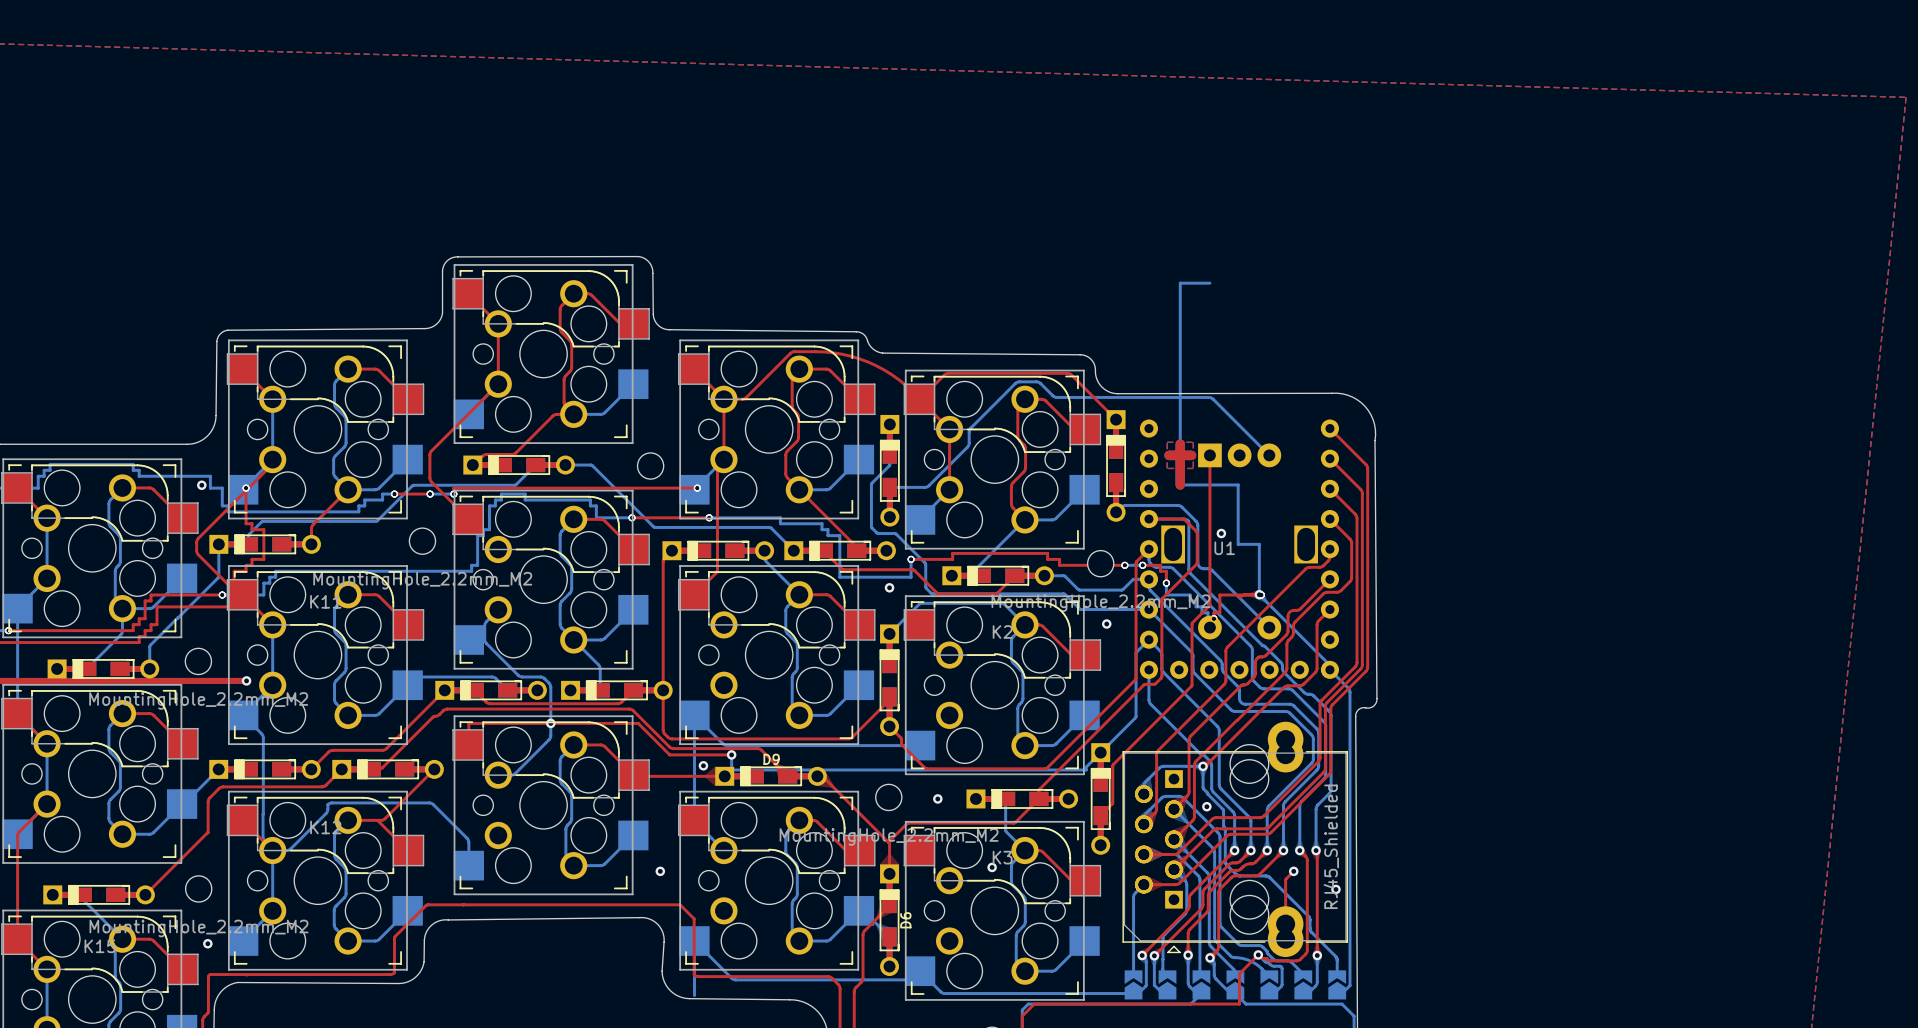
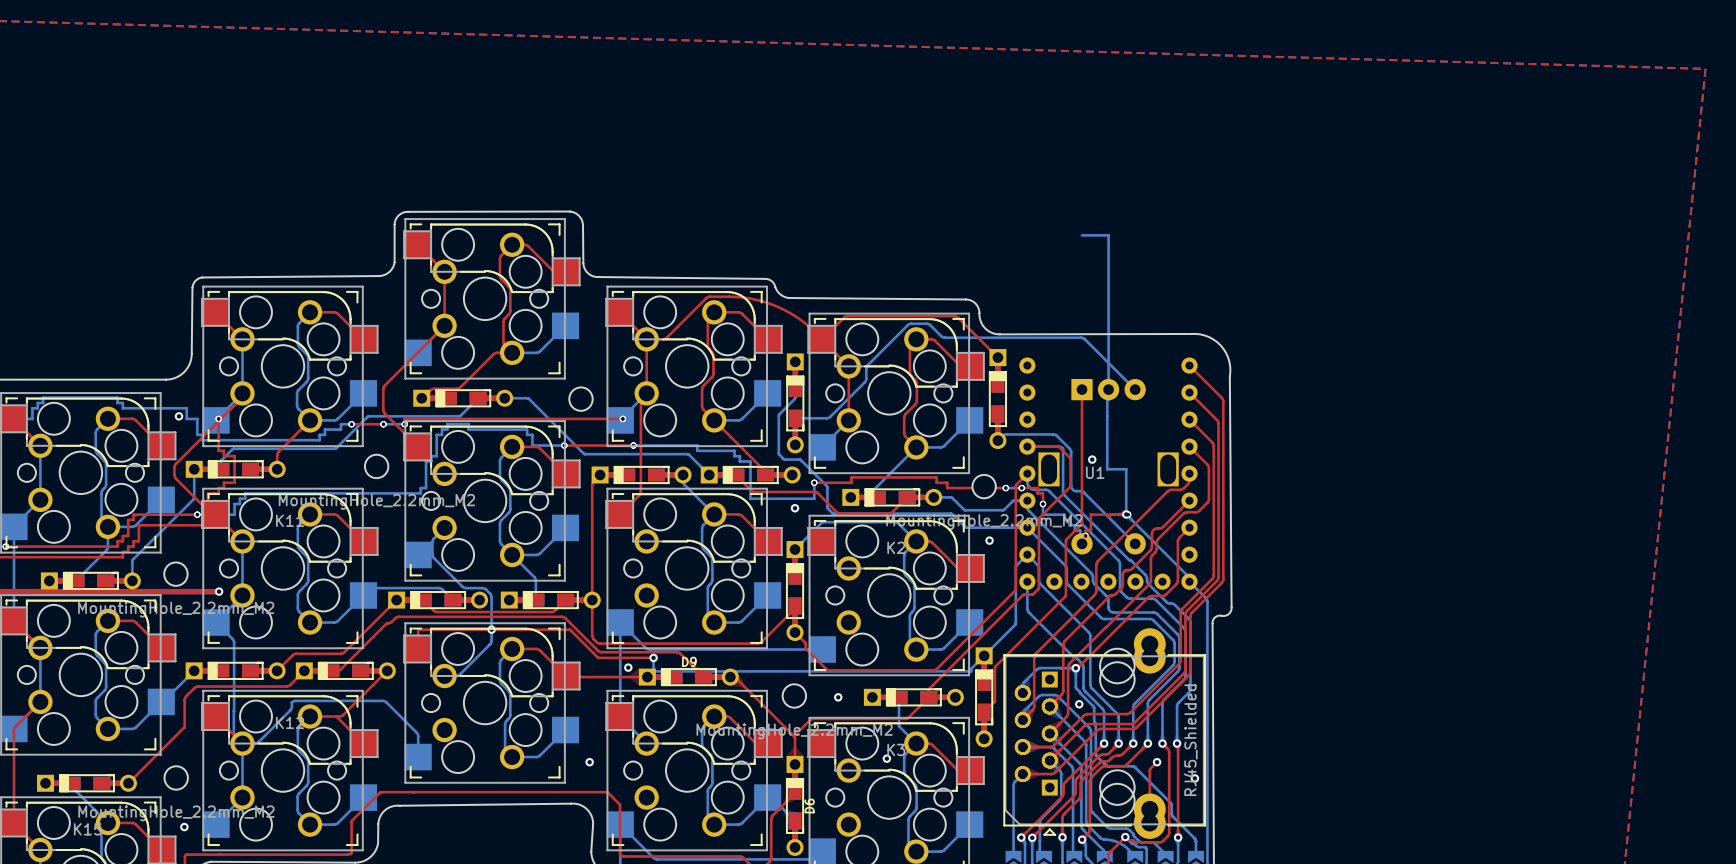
bottom track: (1209, 283) (1180, 283) (1180, 484) -> (1082, 235) (1108, 235) (1107, 416)
top zone outline: (1167, 442) (1193, 442) (1193, 468) (1167, 468) (1167, 442) -> none
top track: (1180, 444) (1180, 484) -> none
top track: (1168, 455) (1191, 455) -> none
bottom track: (1180, 484) (1238, 484) -> none

